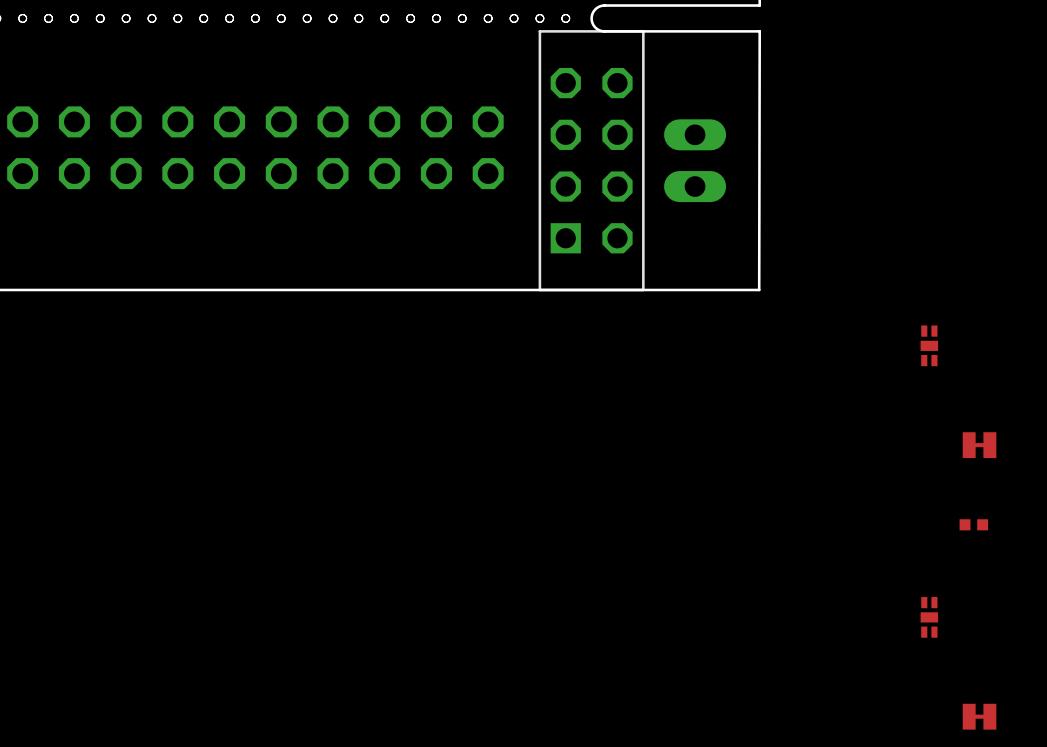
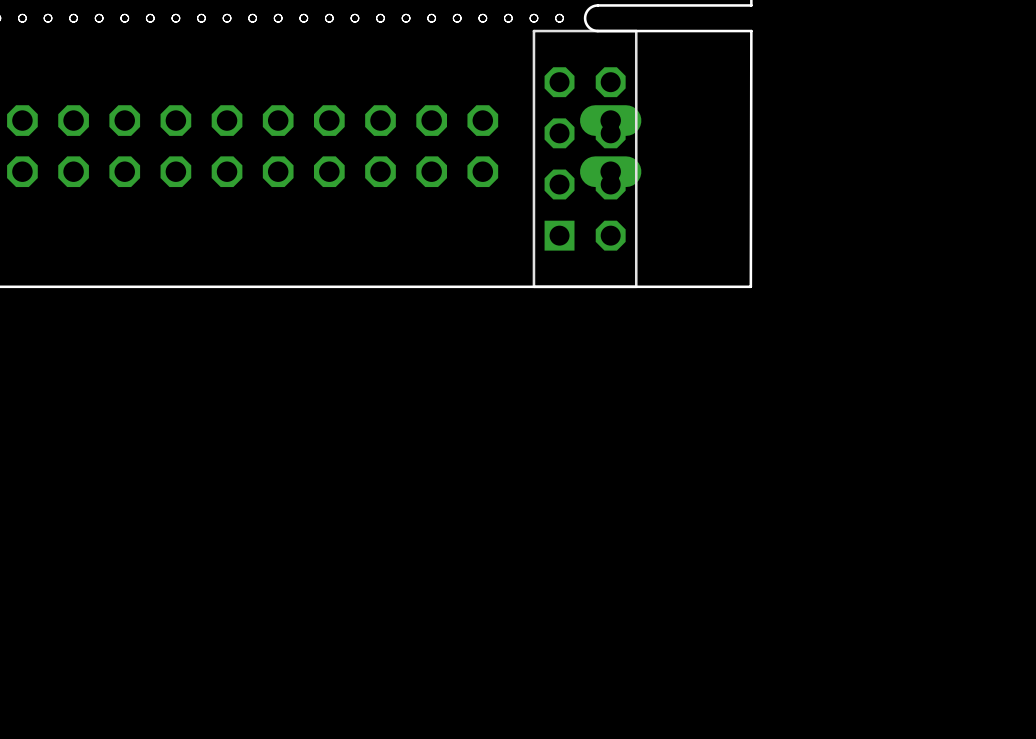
part position: (695, 160) -> (610, 146)
part: (929, 345) -> none
part: (979, 445) -> none
part: (973, 524) -> none
part: (929, 617) -> none
part: (979, 716) -> none

